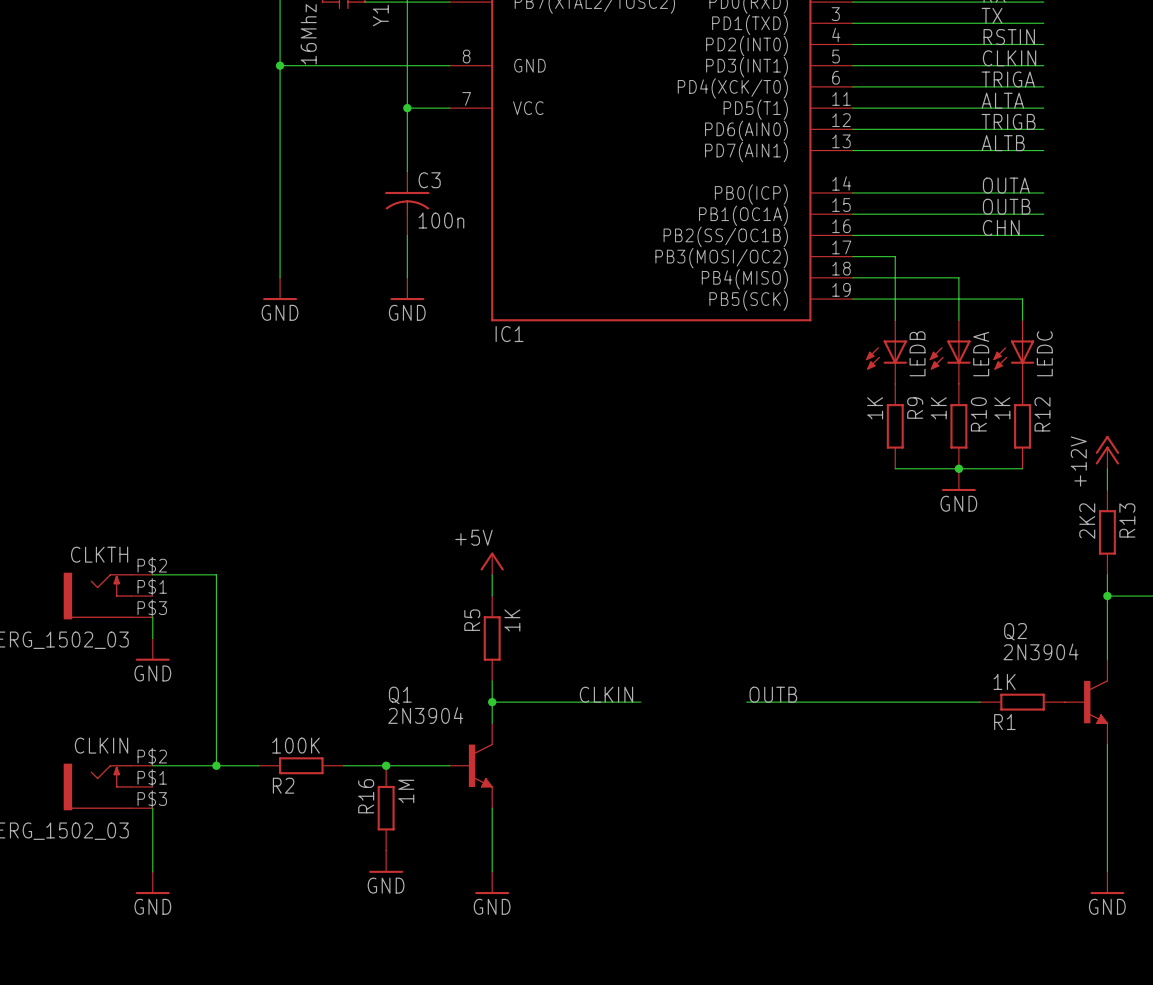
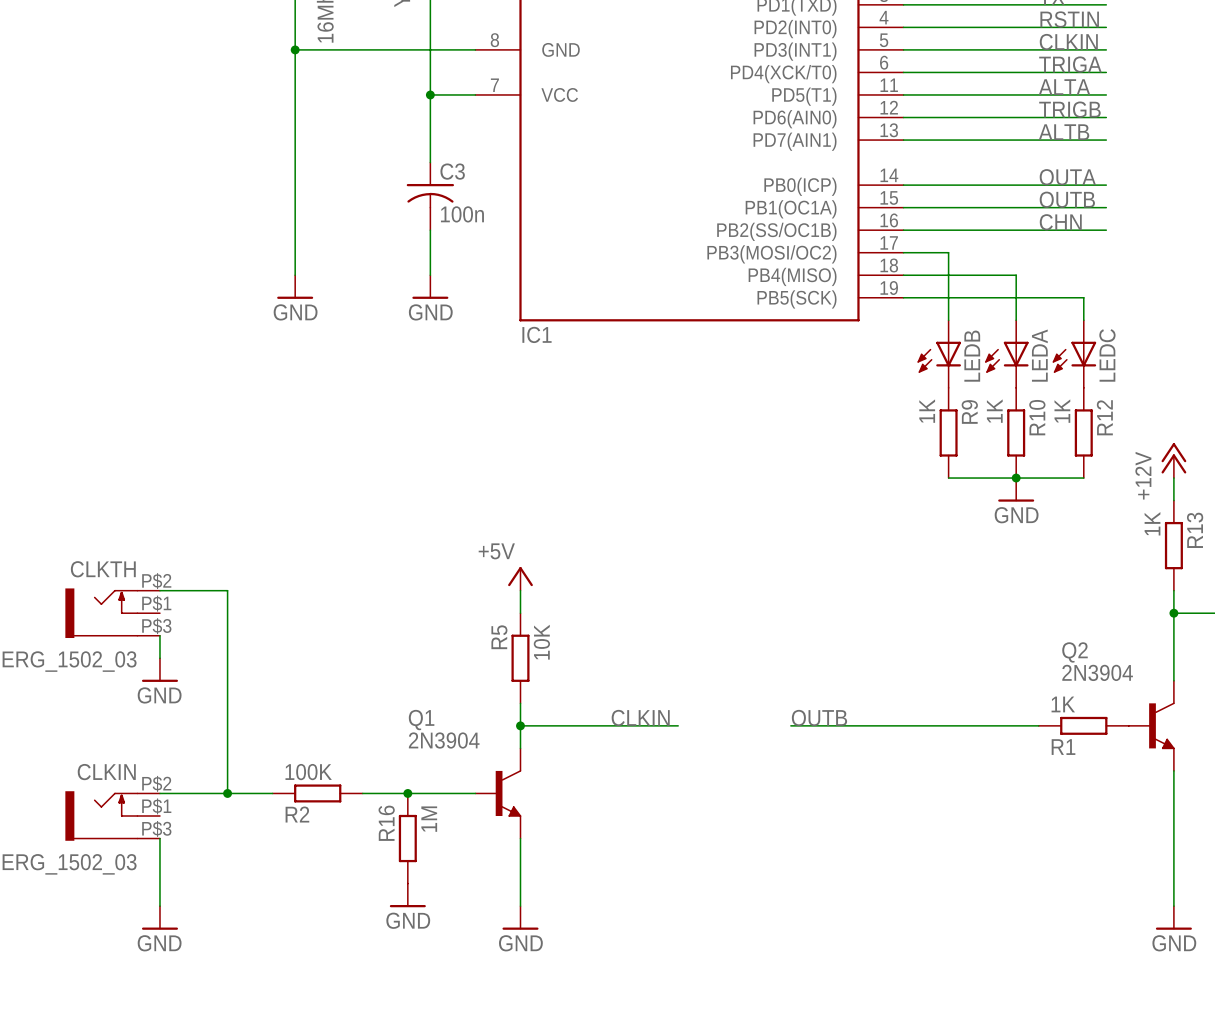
R13 value: 2K2 (1087, 521) -> 1K (1152, 523)
R5 value: 1K (512, 620) -> 10K (541, 642)

